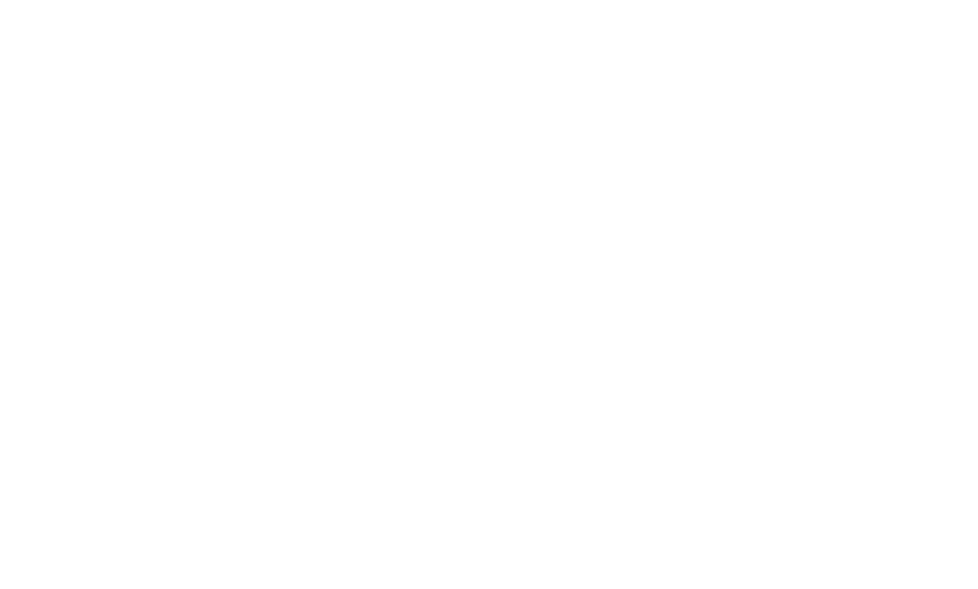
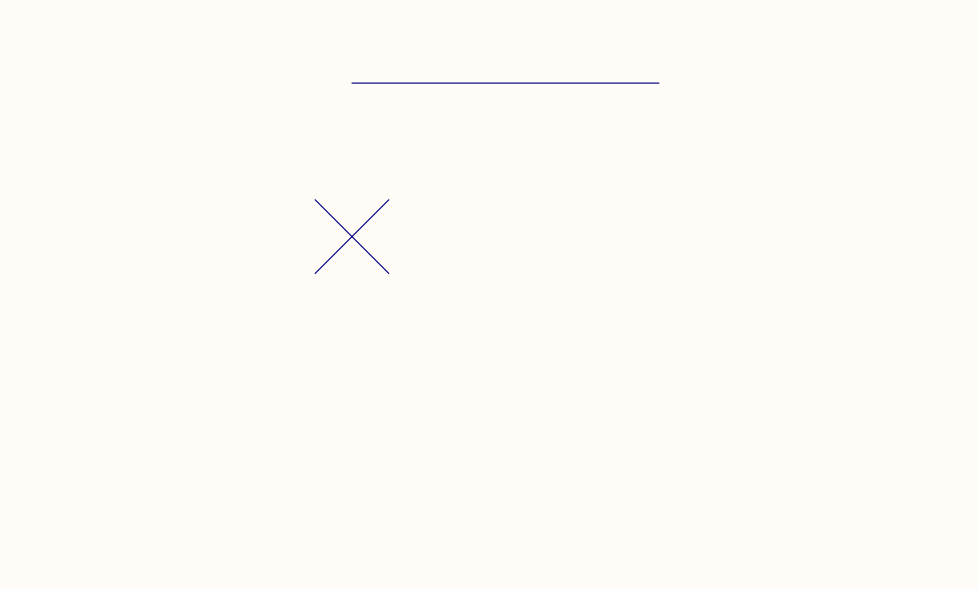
wire: none -> (351, 83) (658, 83)
no-connect mark: none -> (351, 236)

